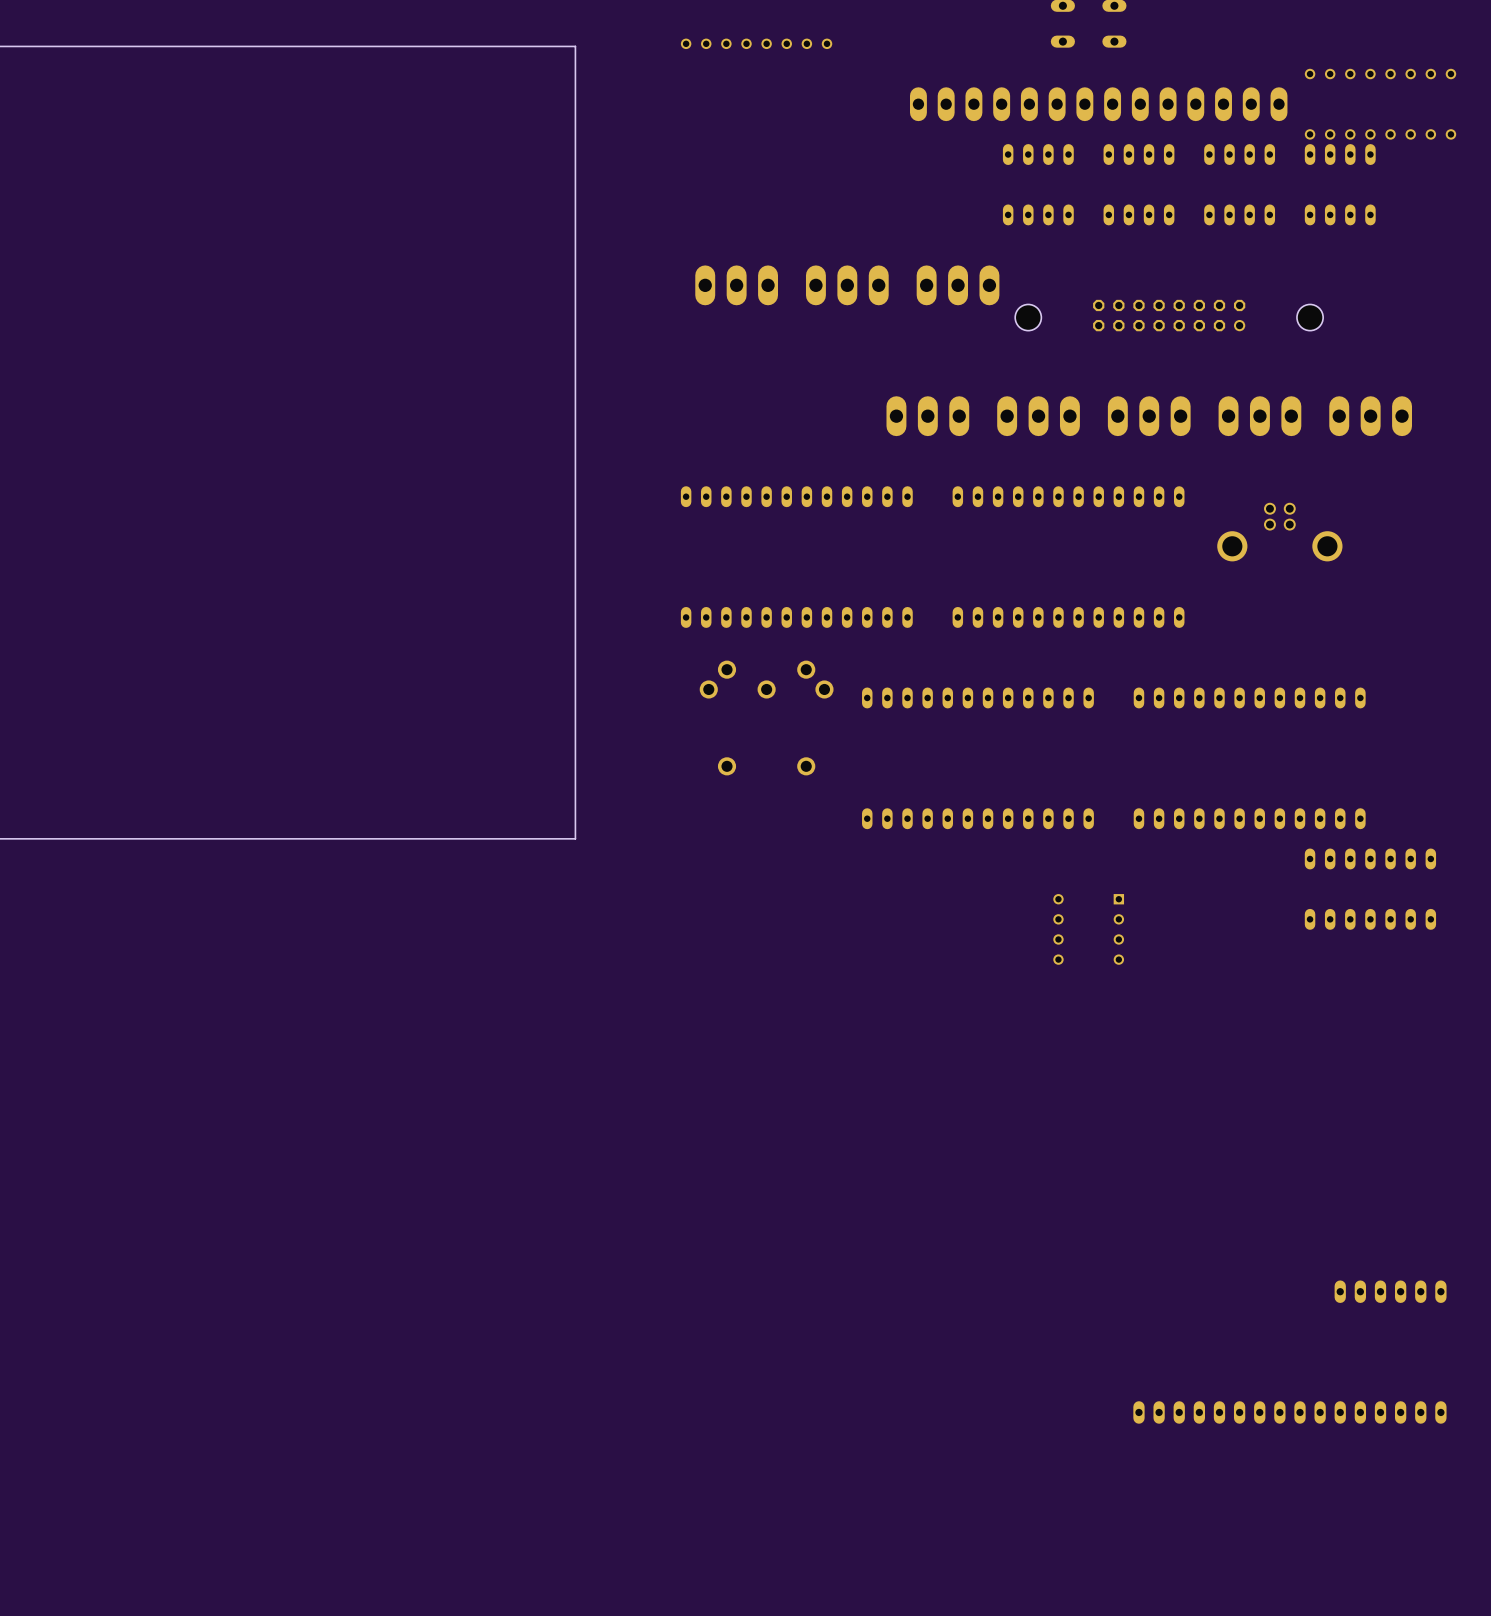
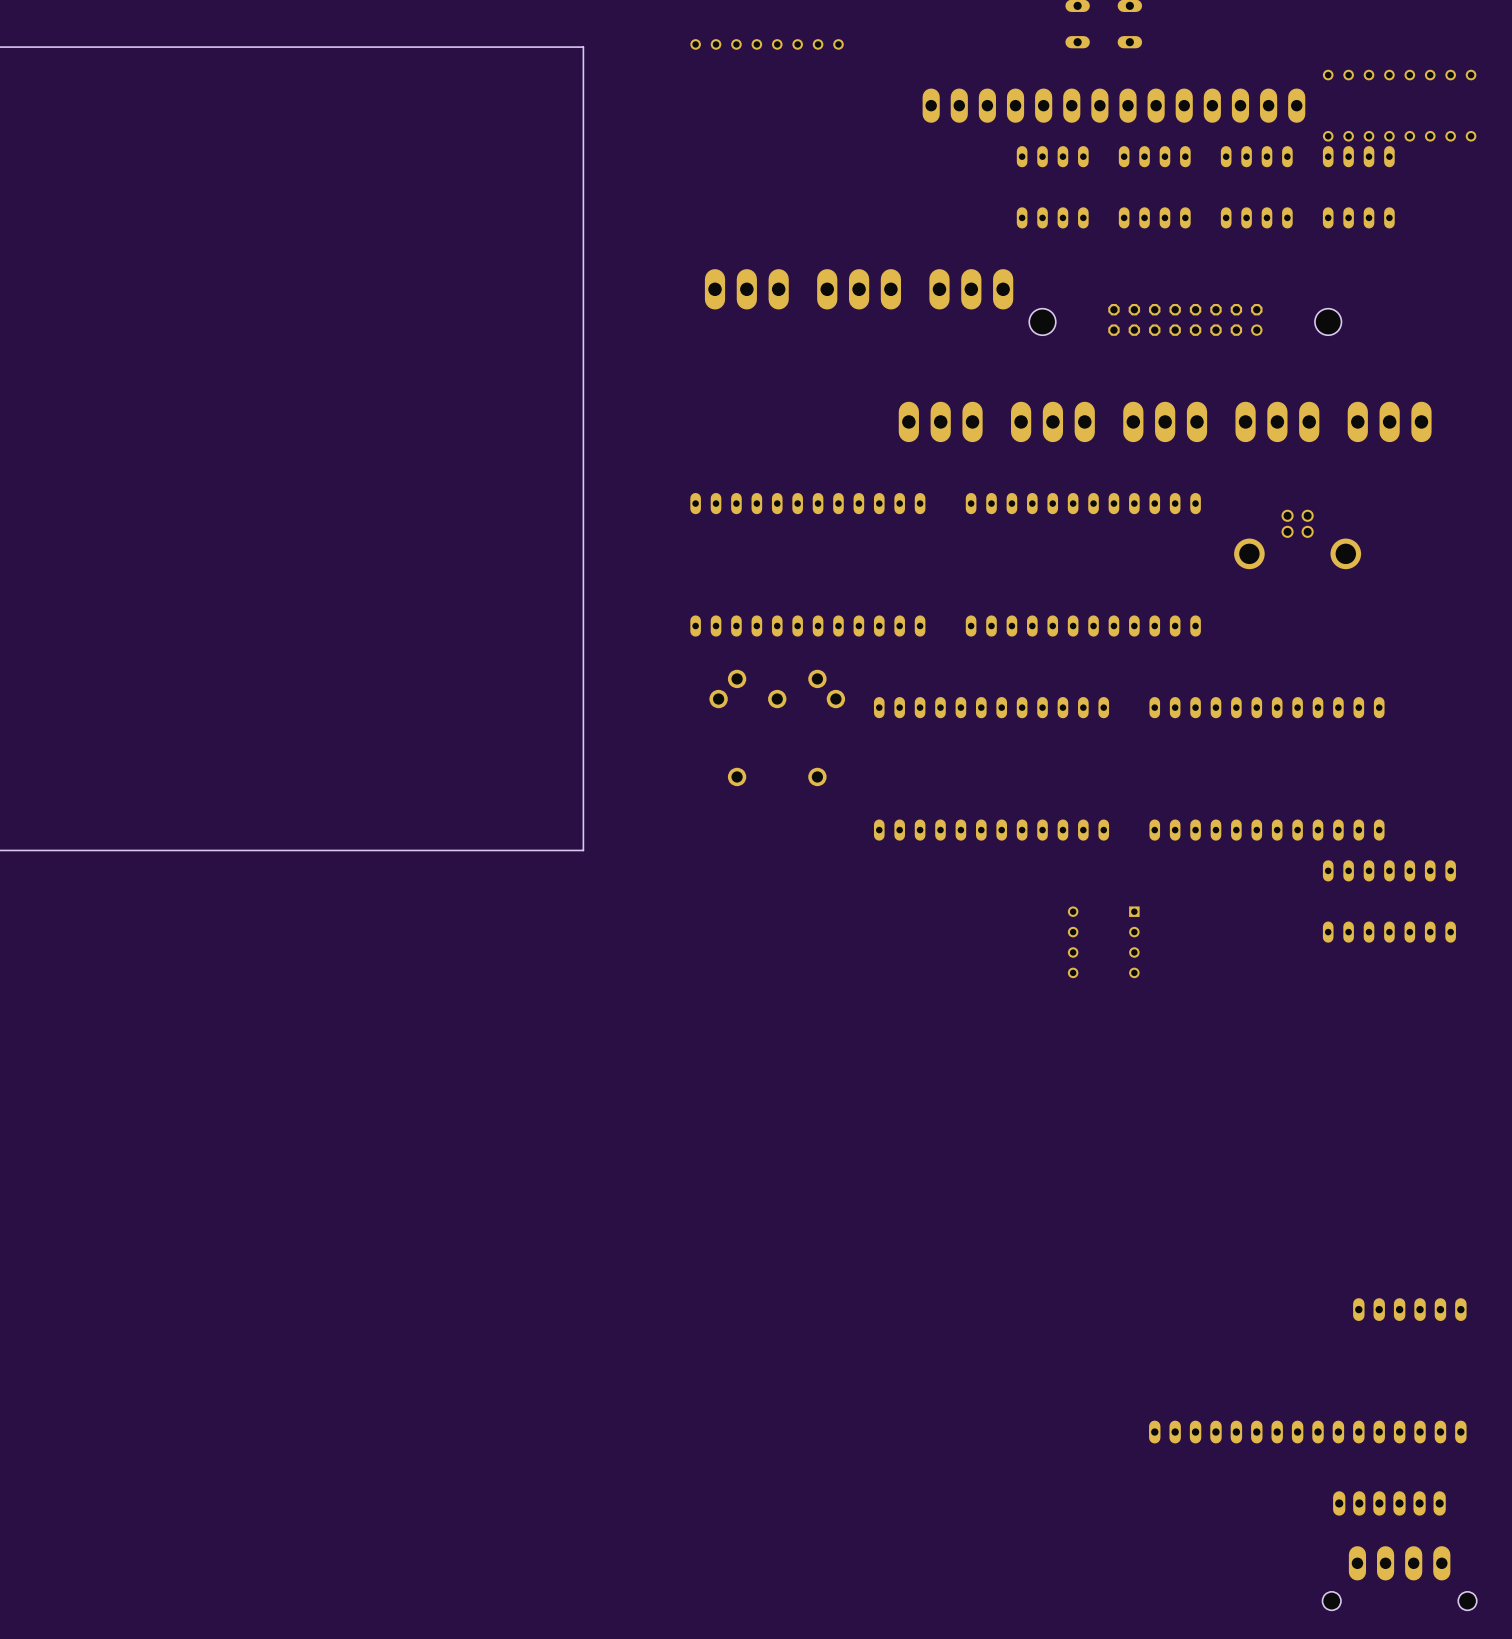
part: none -> (1389, 1503)
part: none -> (1399, 1578)

